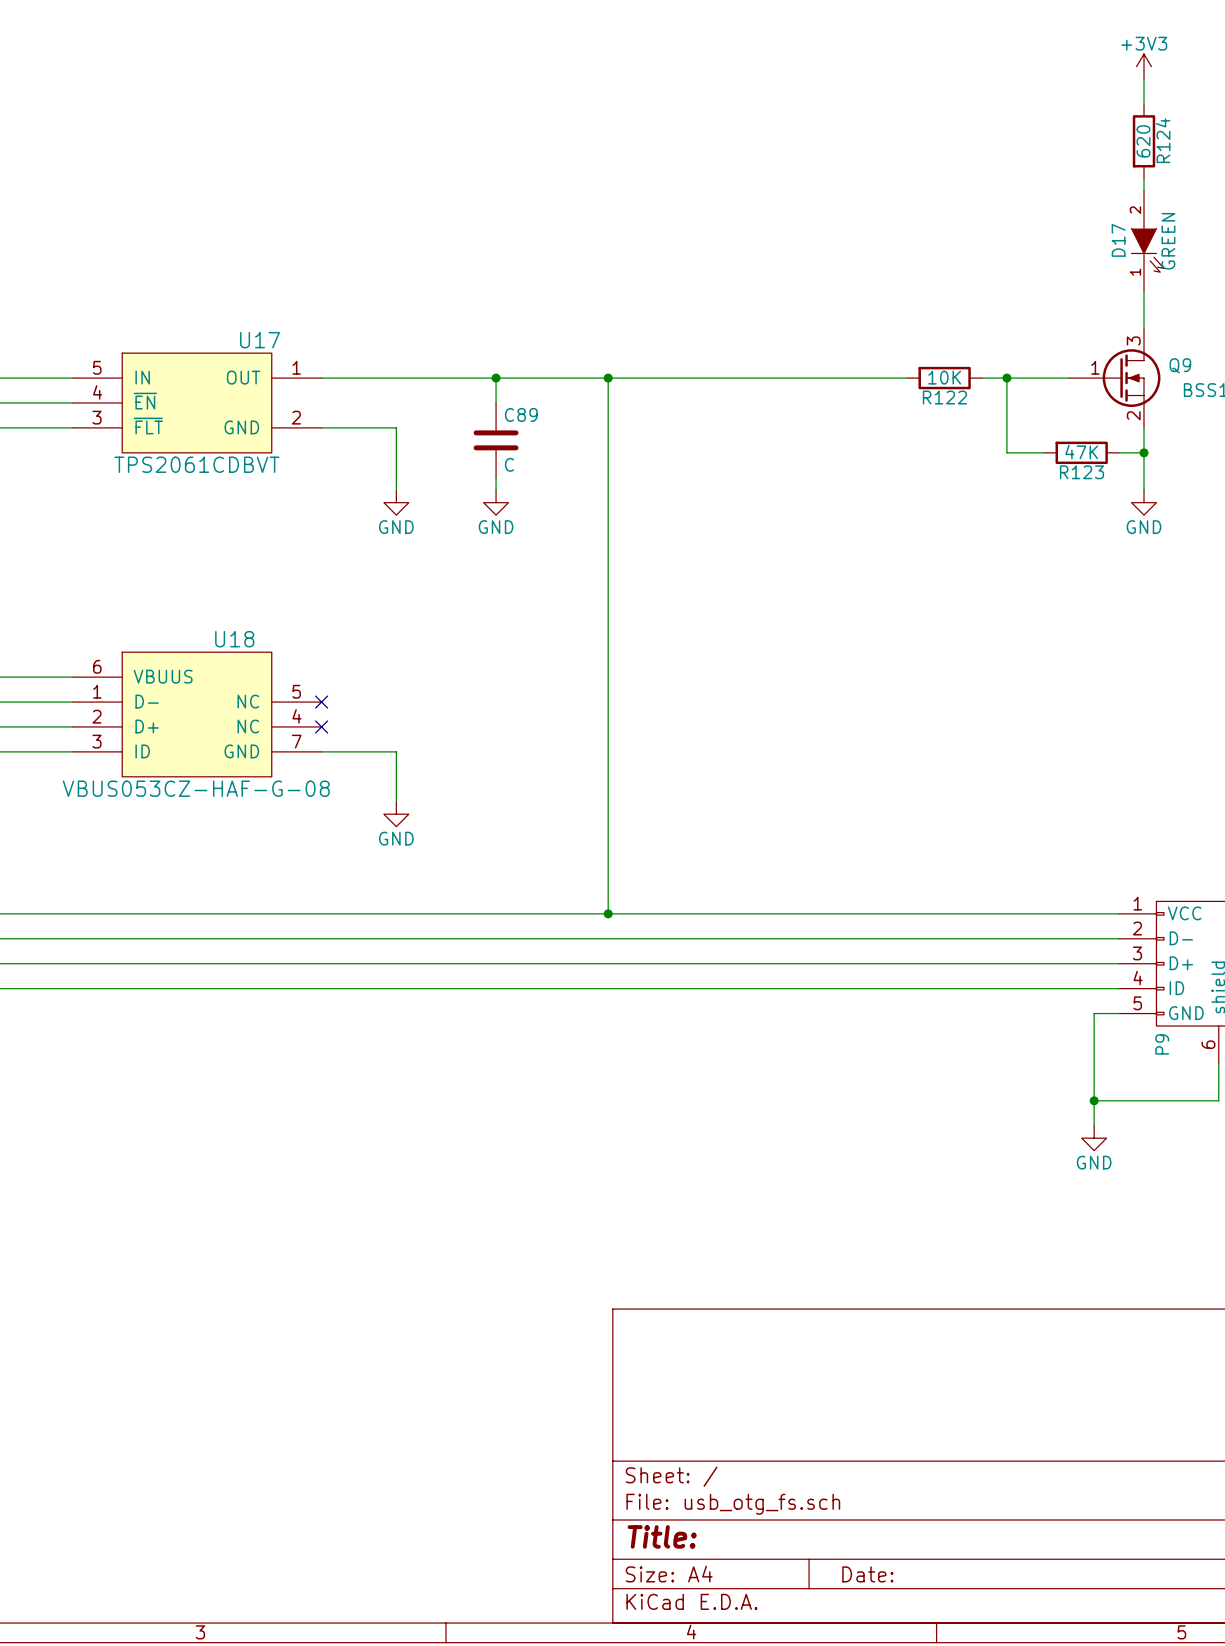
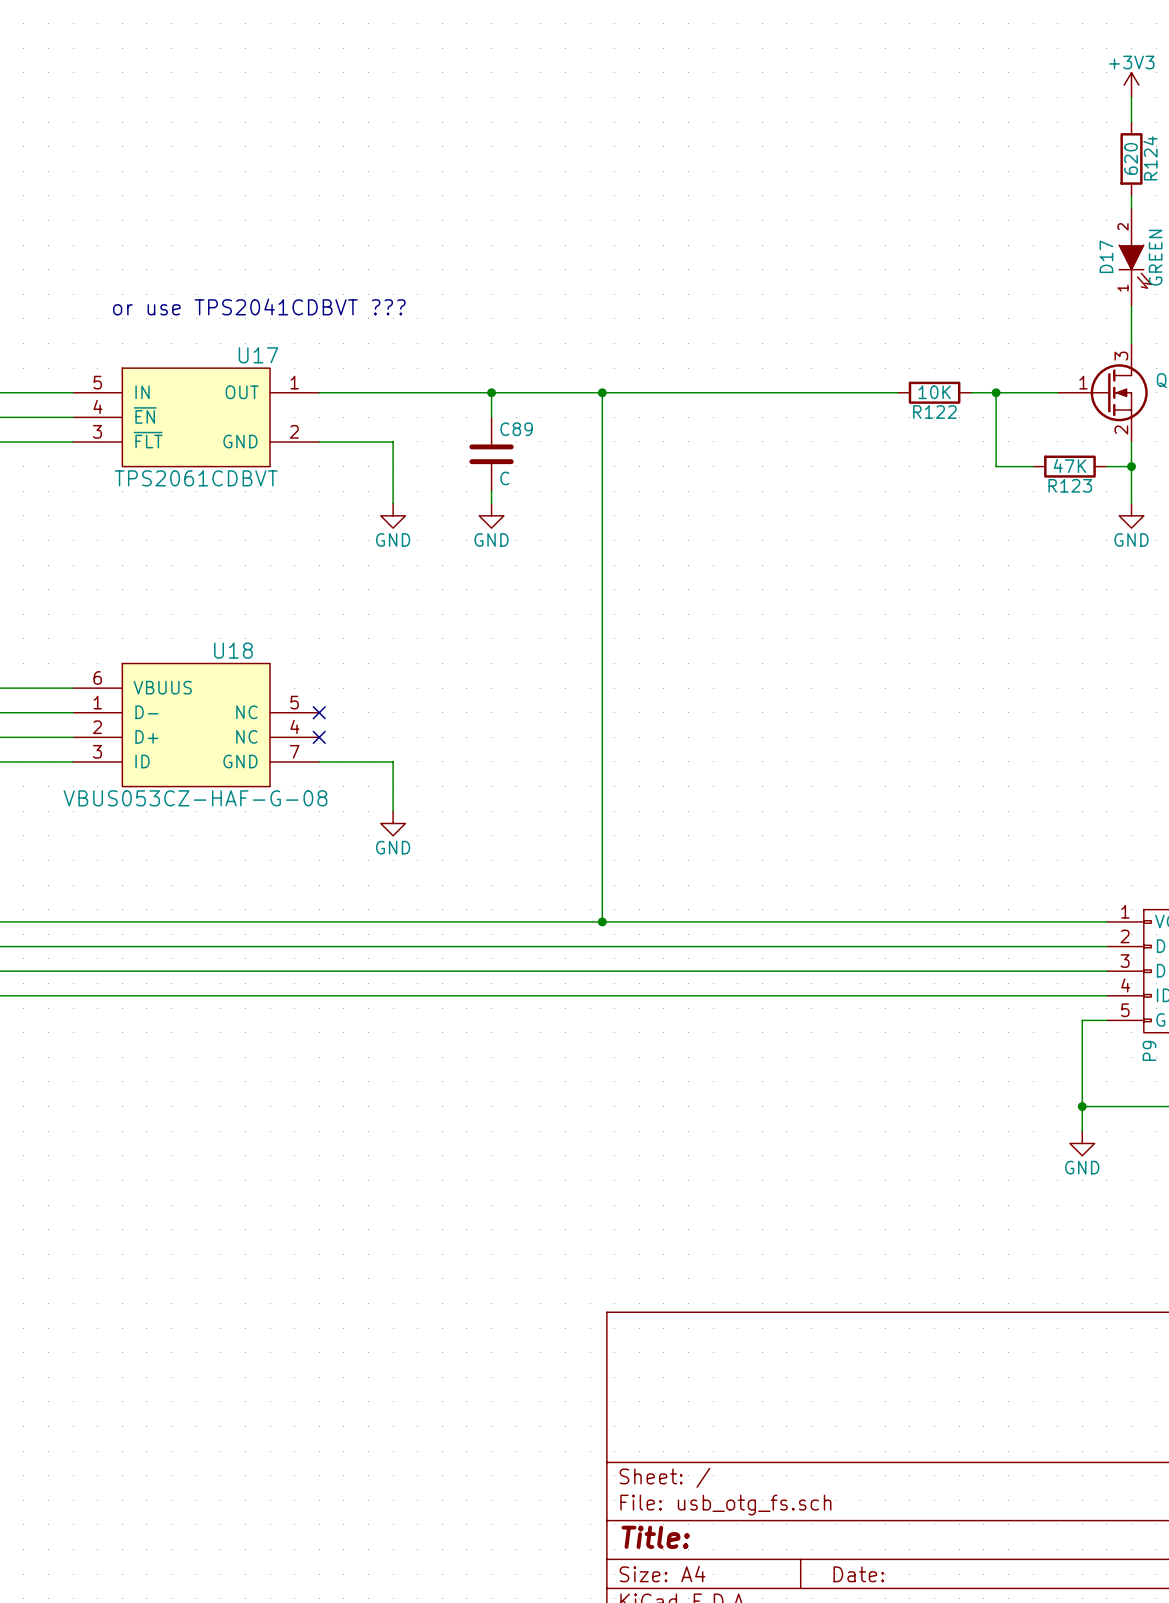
text: none -> or use TPS2041CDBVT ??? (259, 306)

